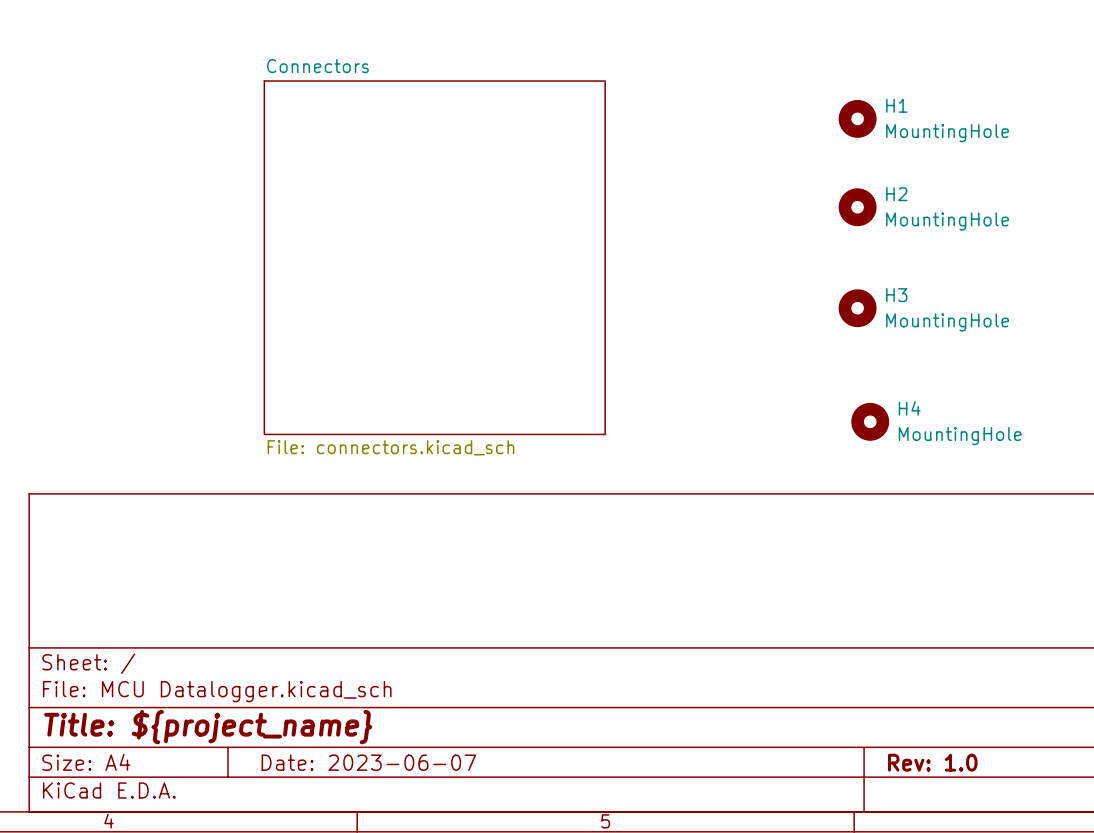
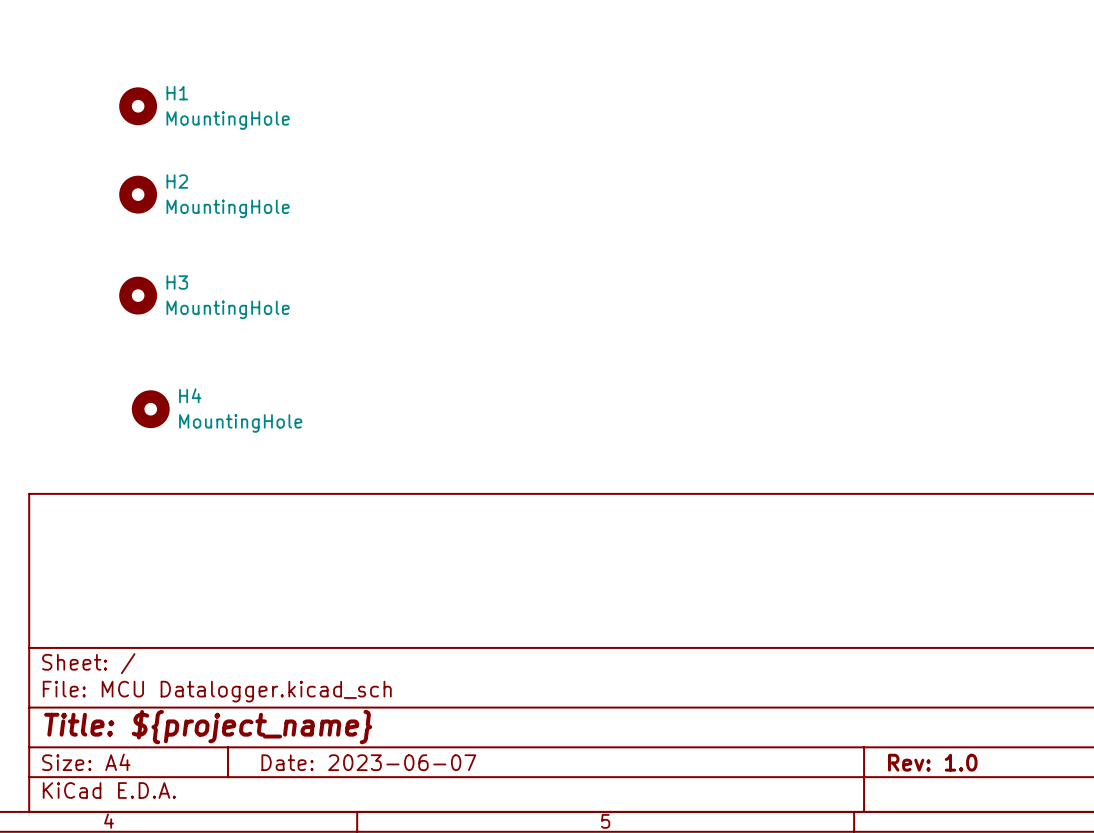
H1 position: (857, 118) -> (138, 106)
H2 position: (857, 207) -> (138, 194)
sheet Connectors: File: connectors.kicad_sch (434, 257) -> none
H3 position: (857, 308) -> (138, 295)
H4 position: (870, 421) -> (150, 409)

